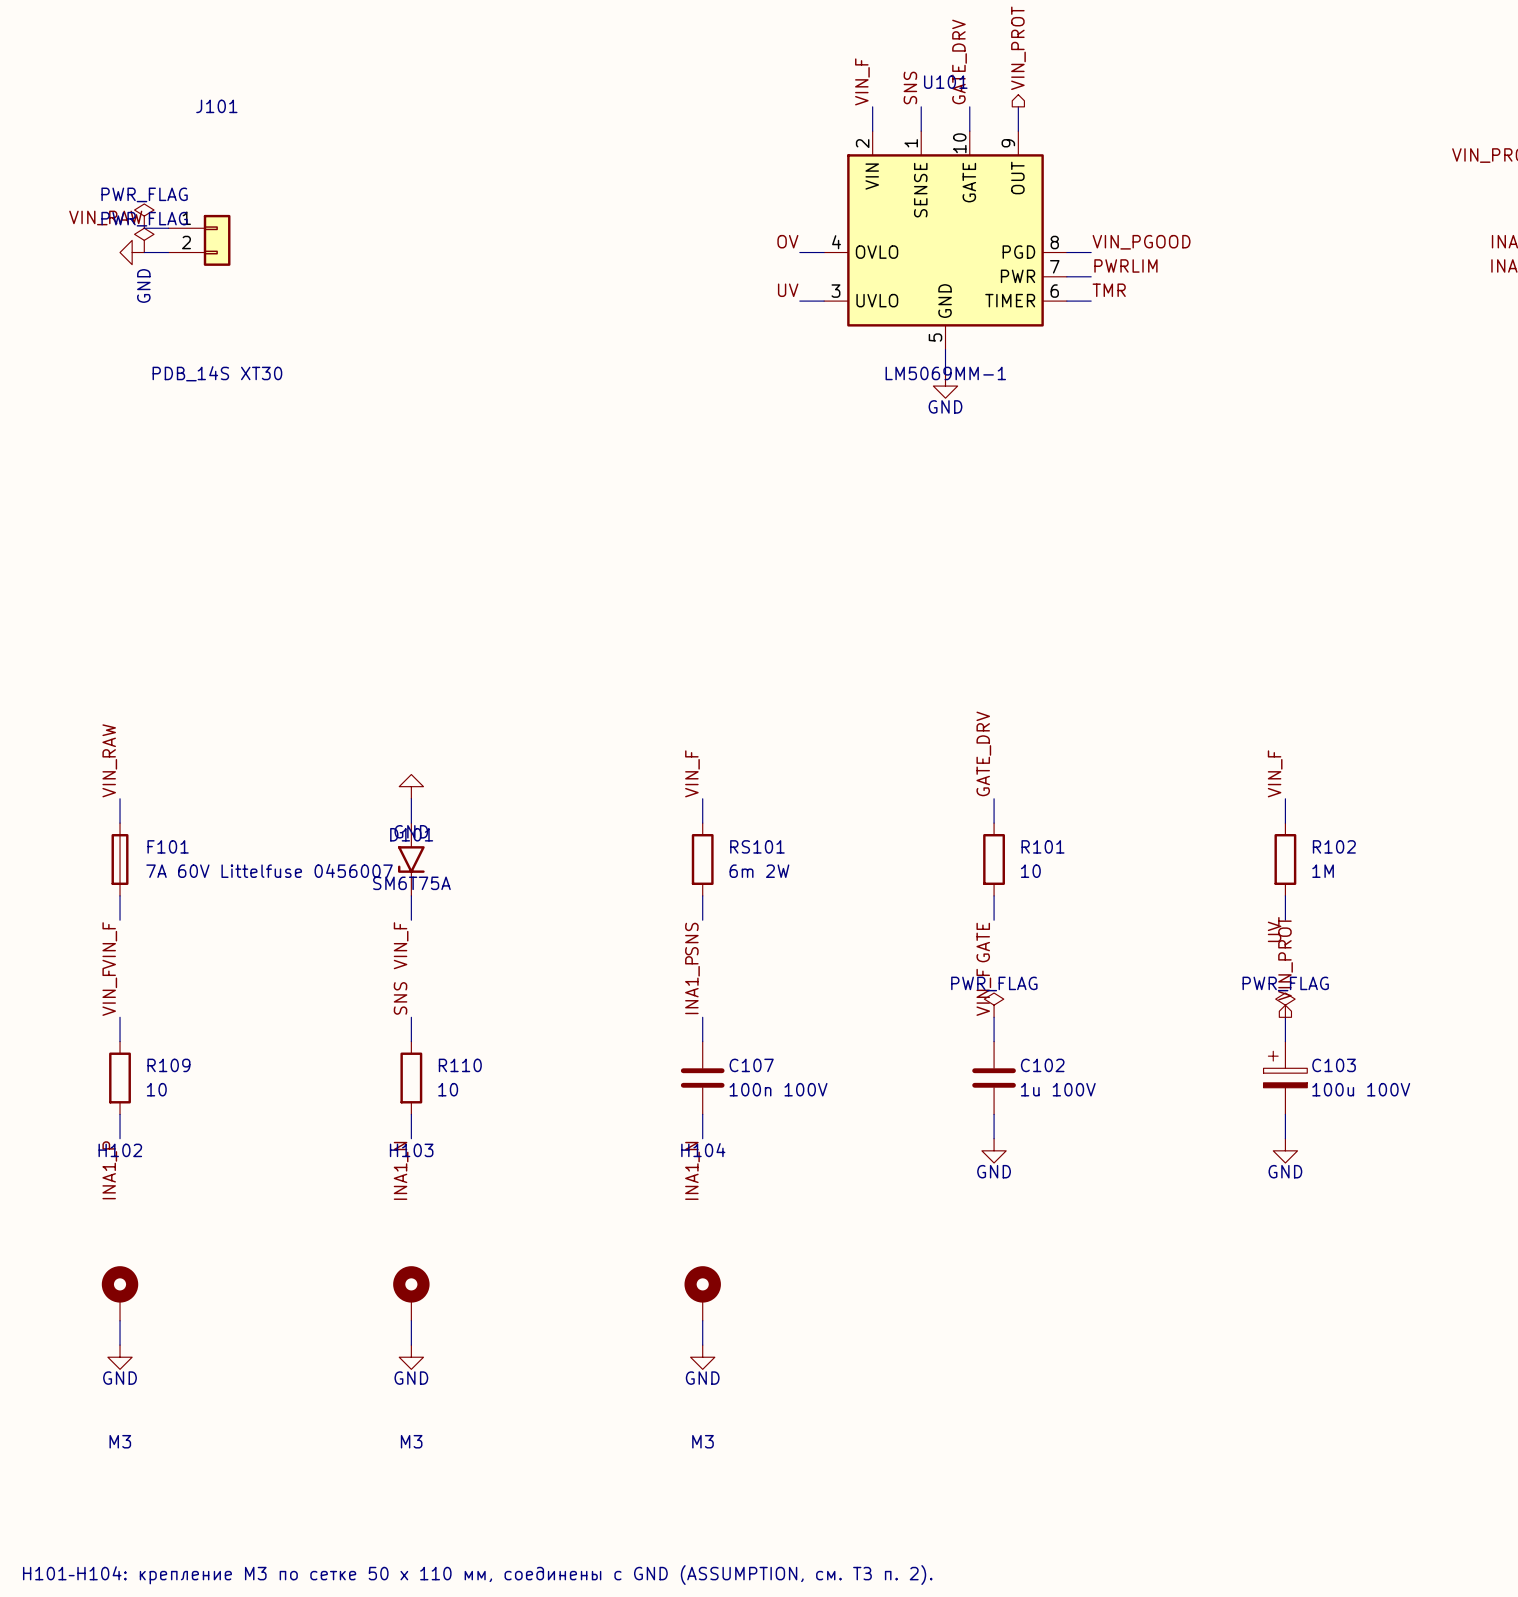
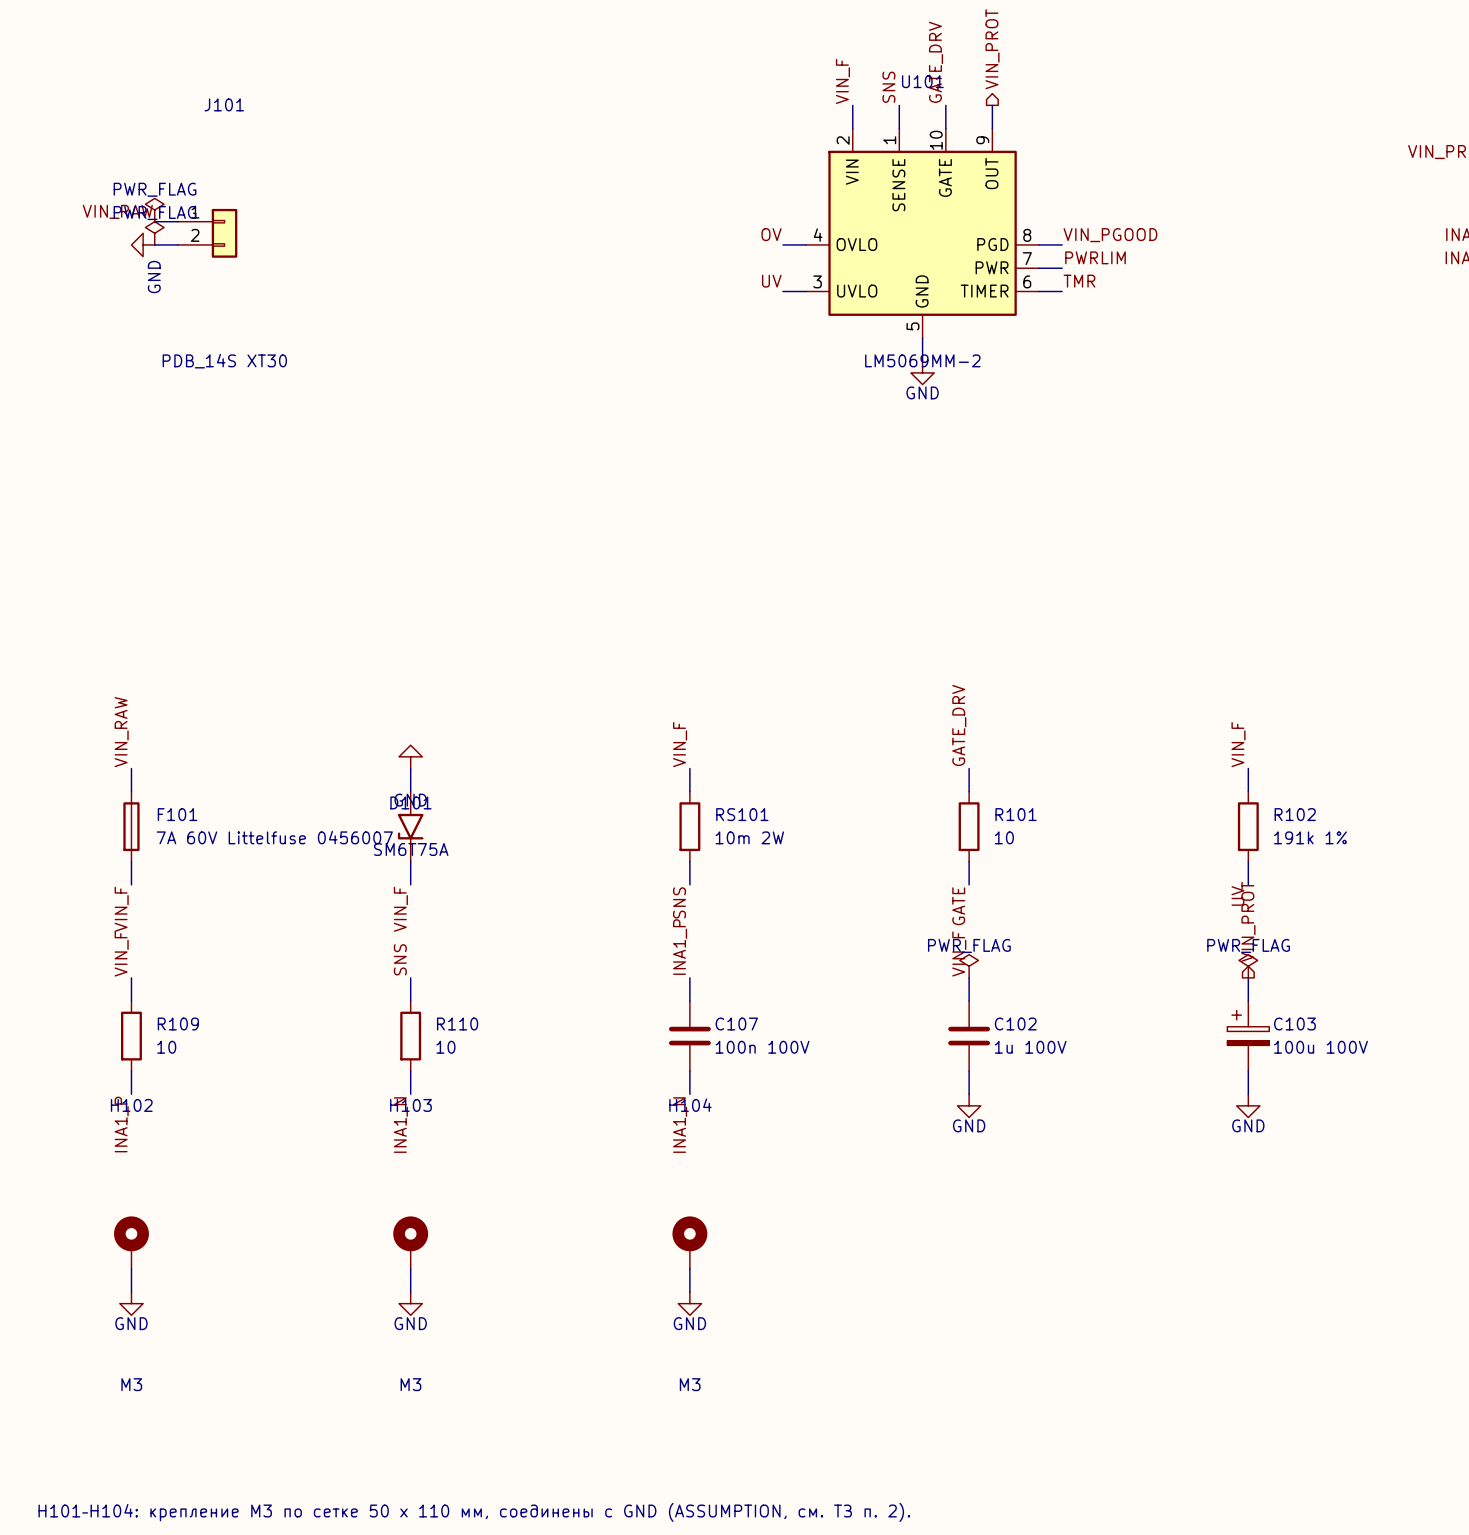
U101 value: LM5069MM-1 (945, 373) -> LM5069MM-2 (922, 360)
RS101 value: 6m 2W (759, 871) -> 10m 2W (749, 837)
R102 value: 1M (1323, 871) -> 191k 1% (1310, 837)

